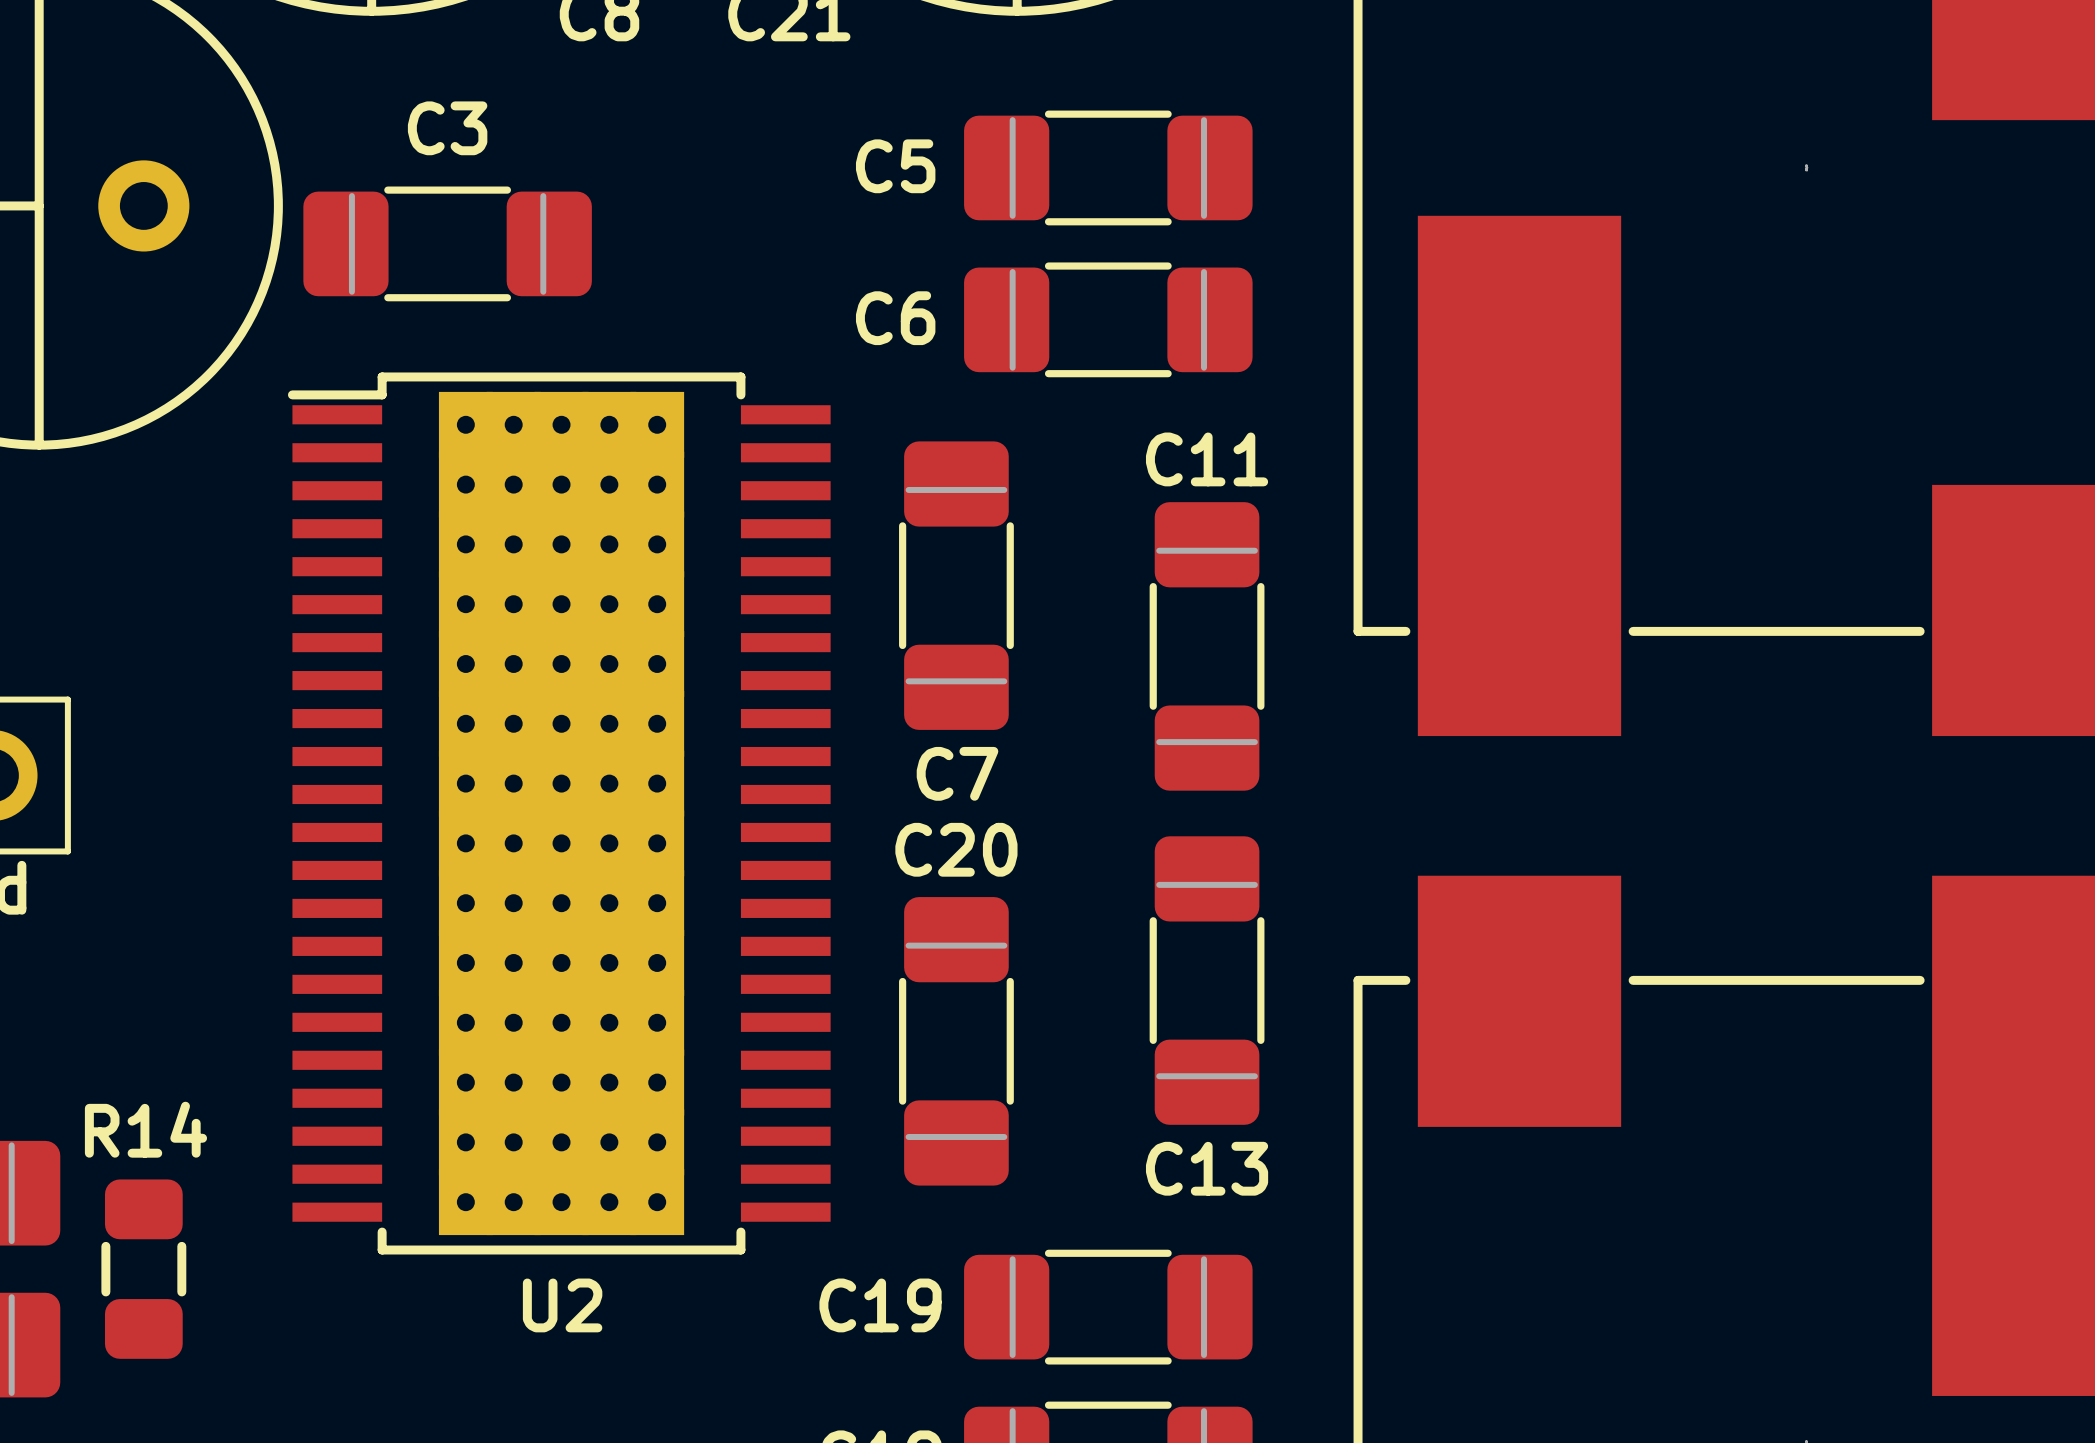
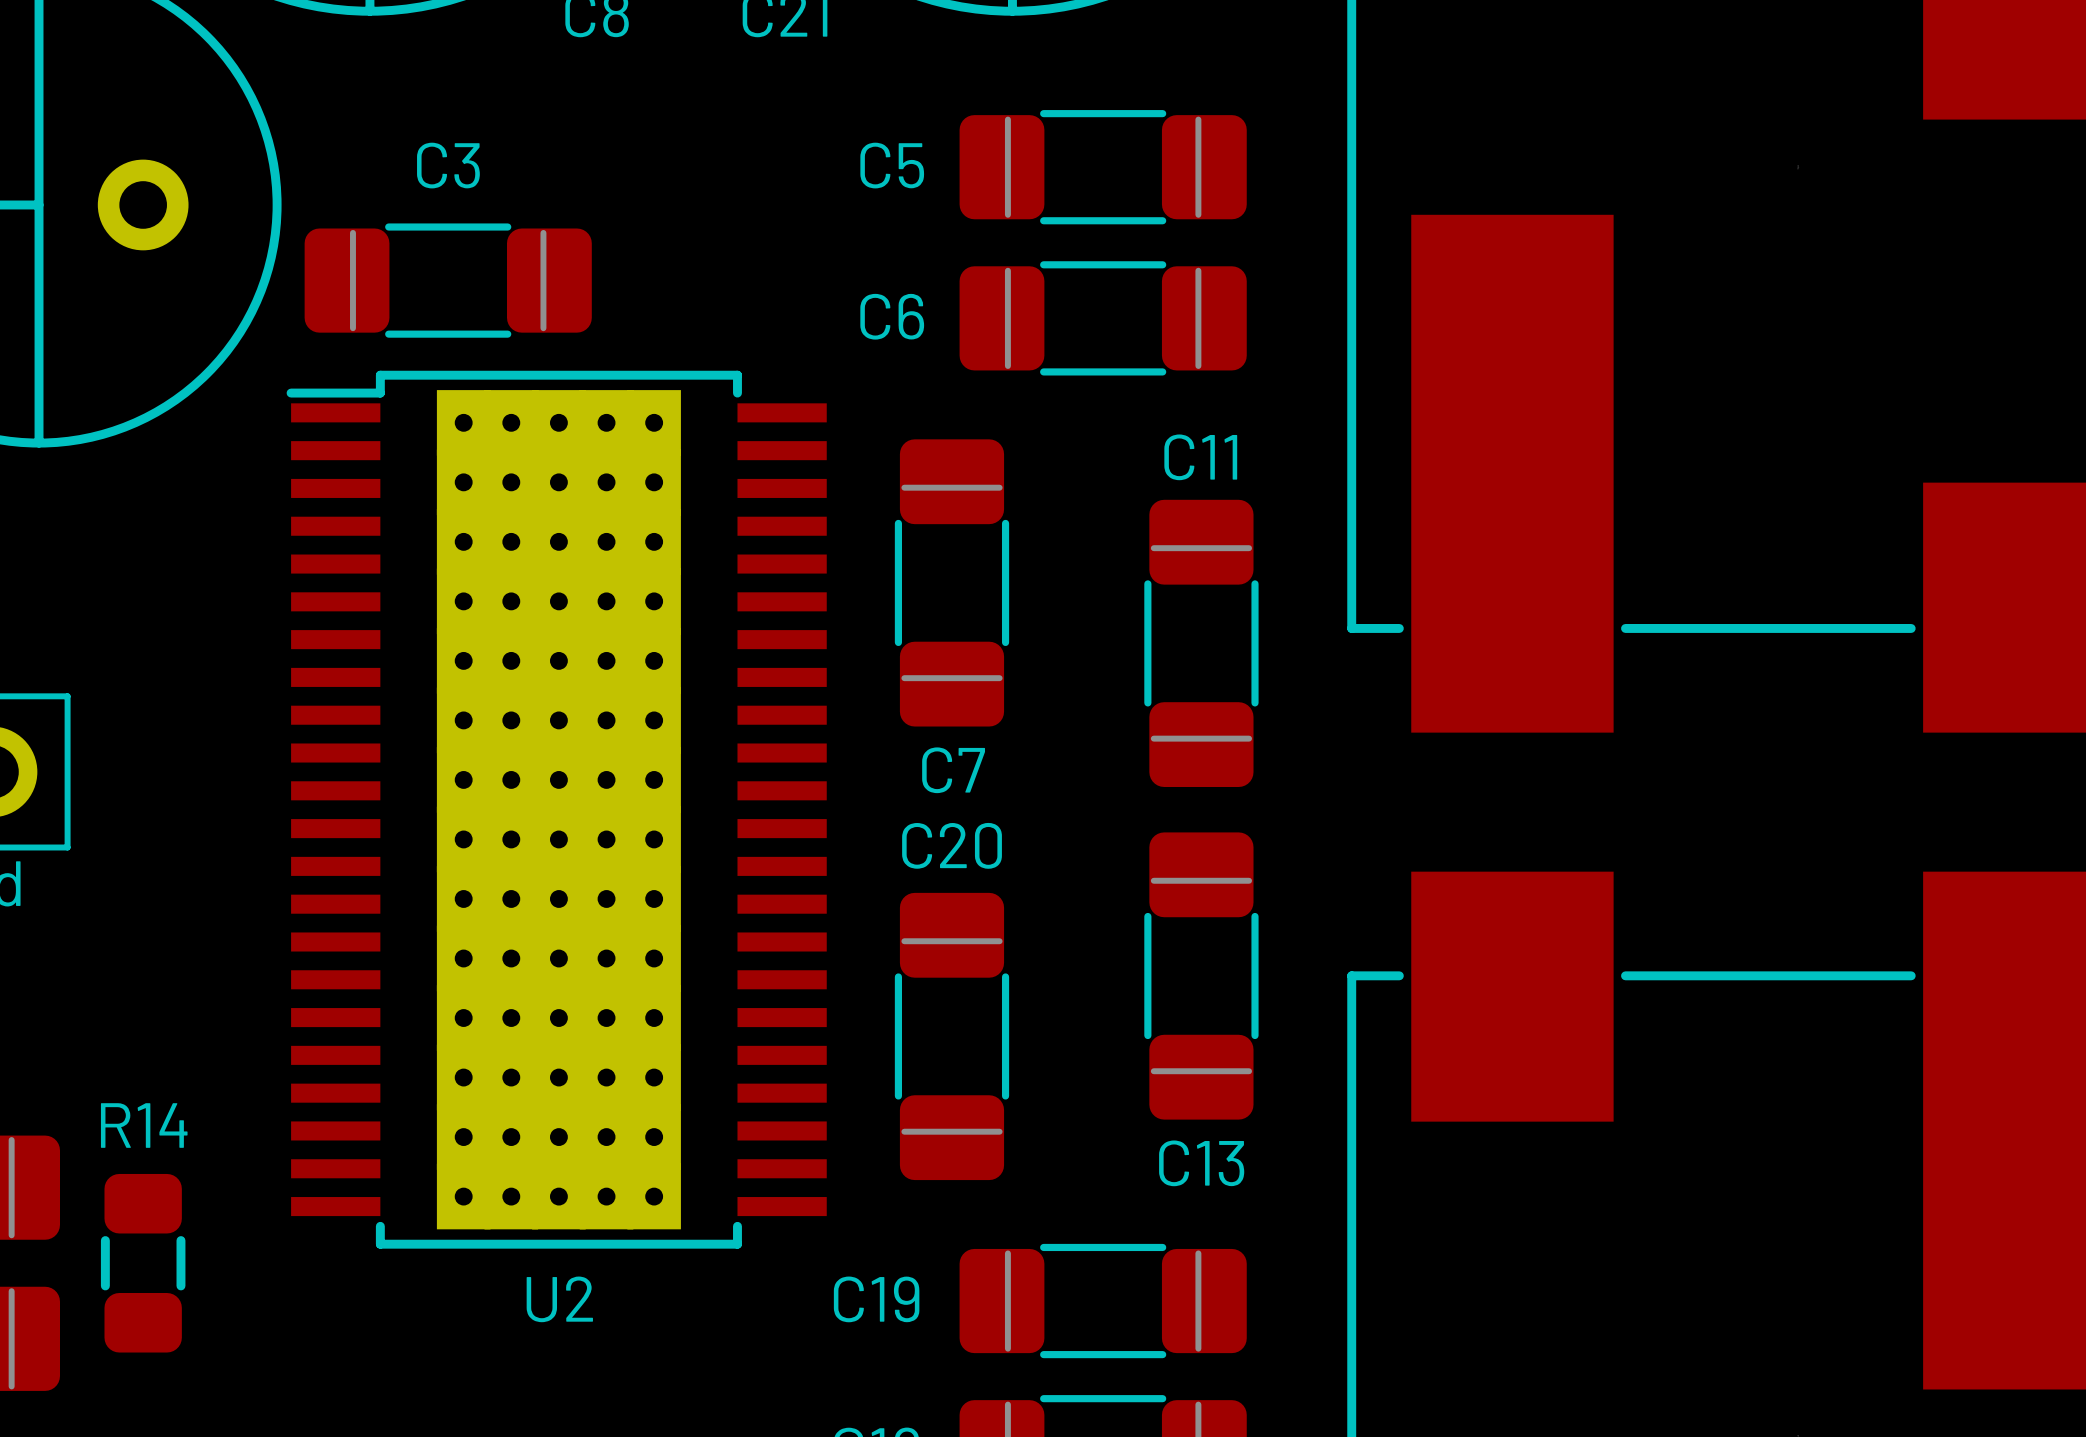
C3 position: (447, 243) -> (448, 280)

